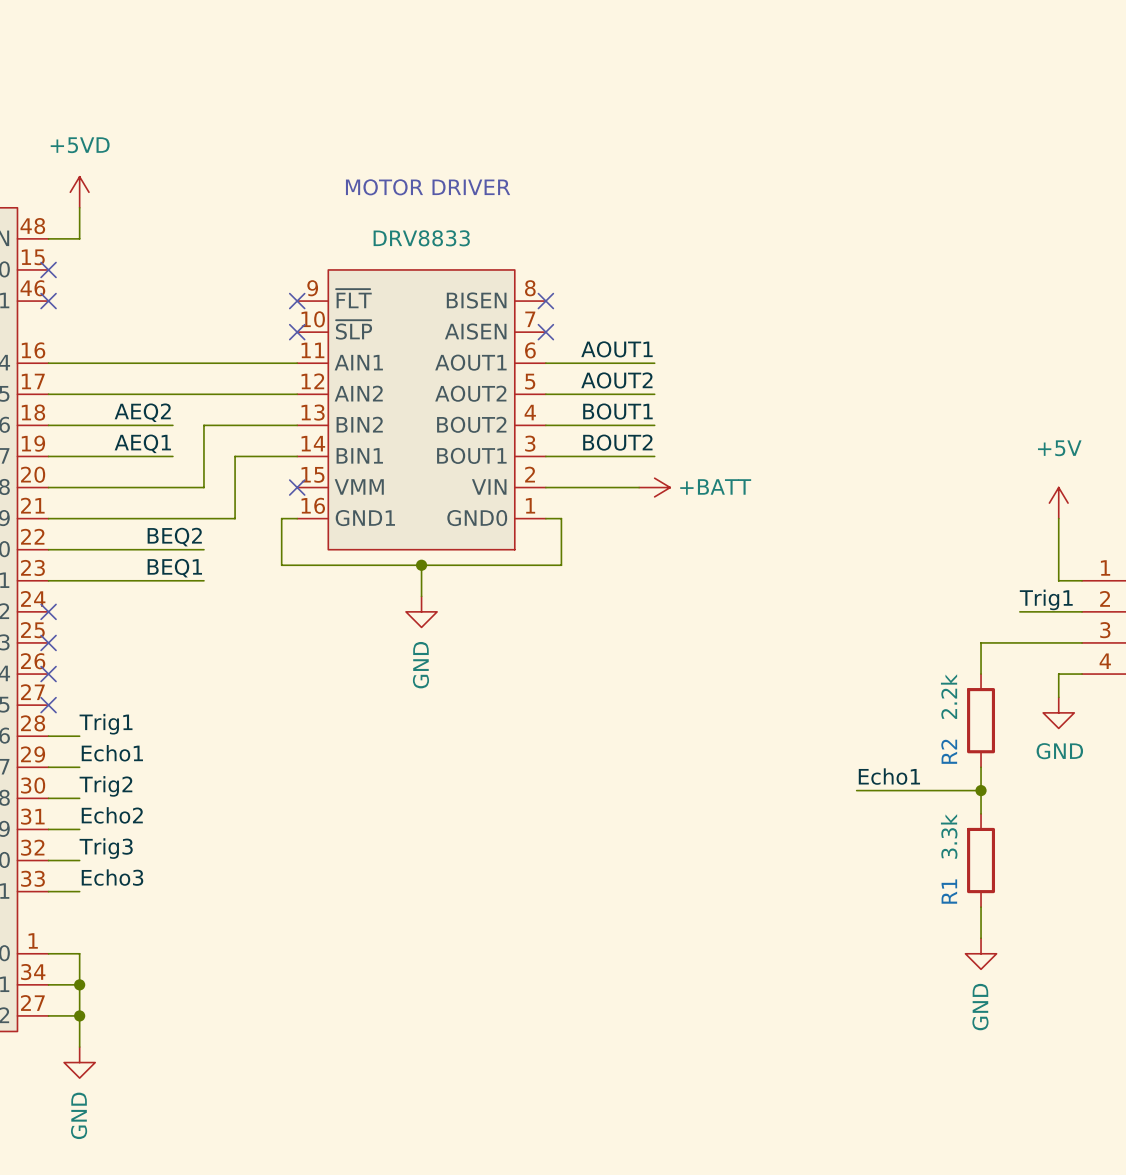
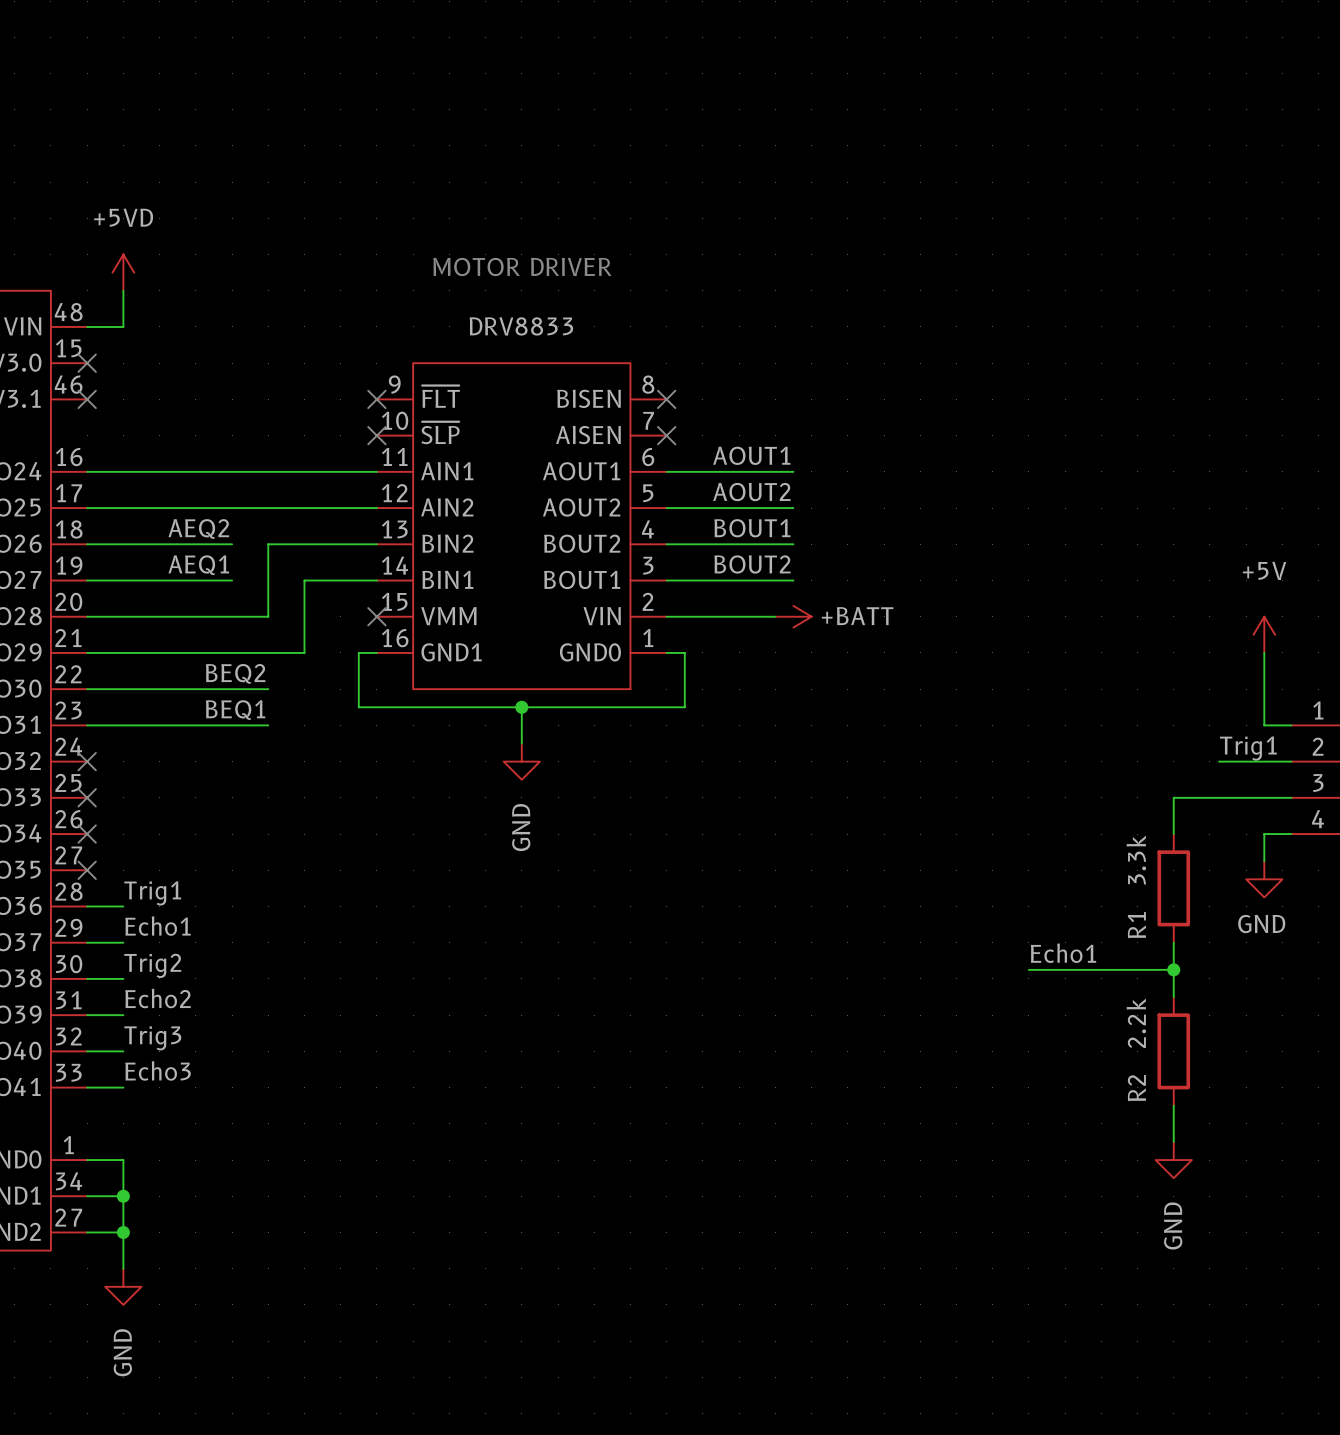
R2 value: 2.2k (949, 696) -> 3.3k (1136, 860)
R2 name: R2 (949, 751) -> R1 (1136, 925)
R1 value: 3.3k (949, 836) -> 2.2k (1136, 1023)
R1 name: R1 (949, 891) -> R2 (1136, 1088)

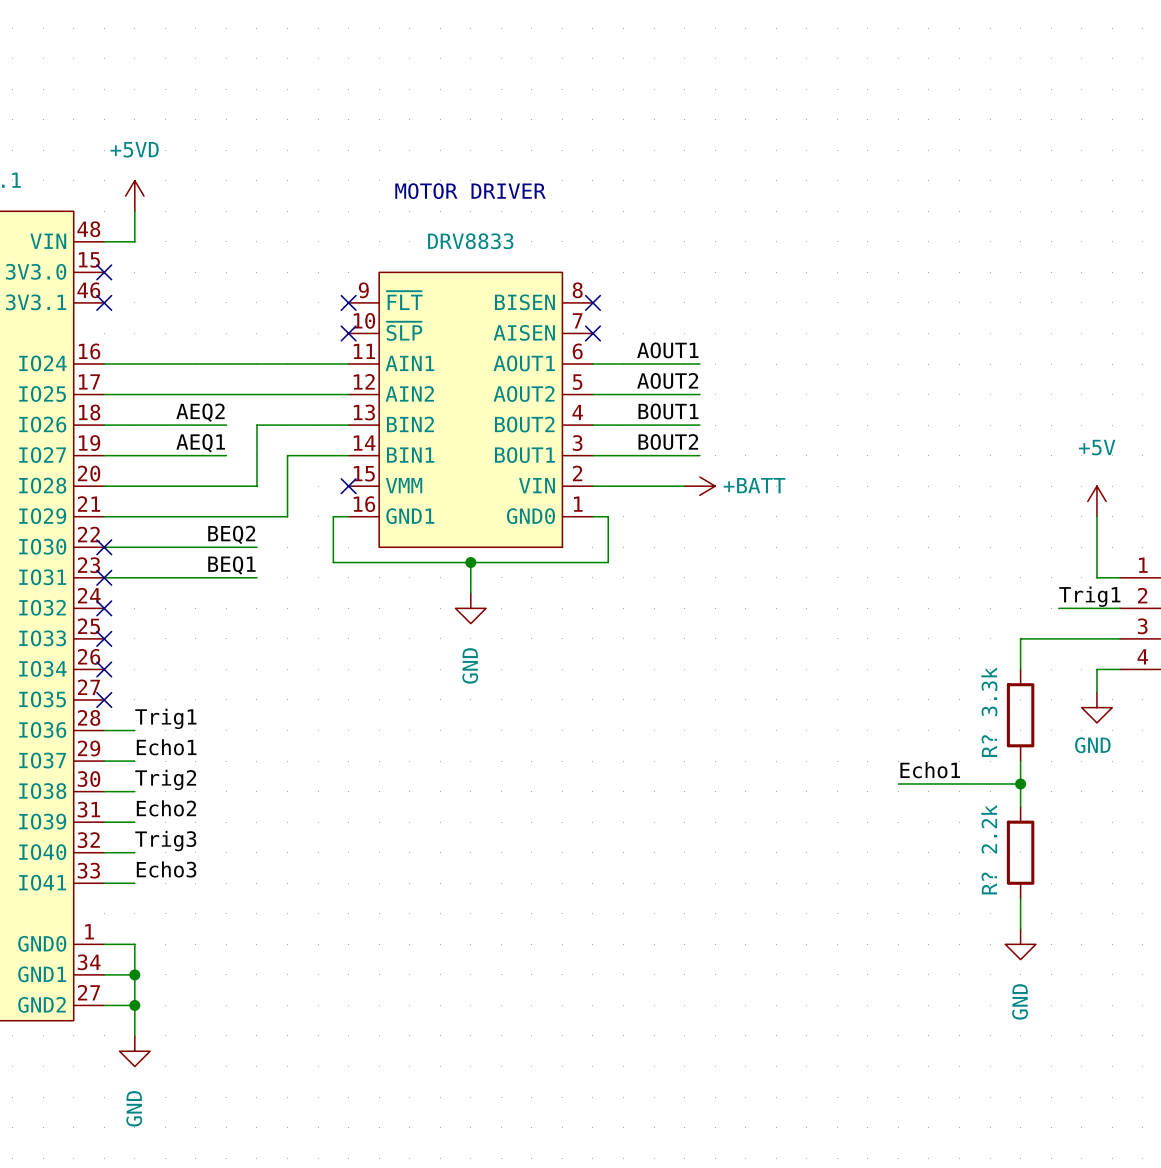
no-connect mark: none -> (104, 547)
no-connect mark: none -> (104, 577)
R1 name: R1 (1136, 925) -> R? (989, 746)
R2 name: R2 (1136, 1088) -> R? (989, 883)

